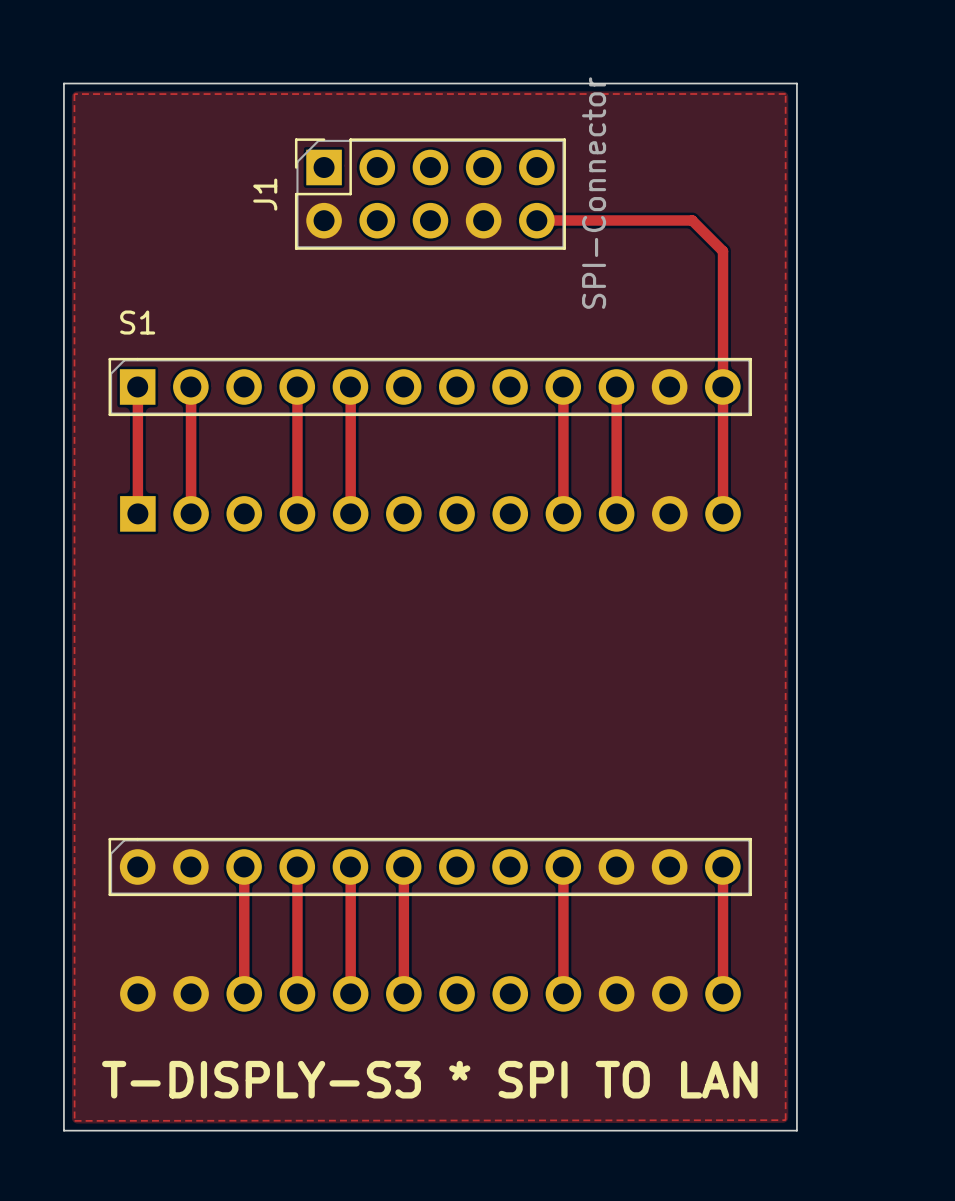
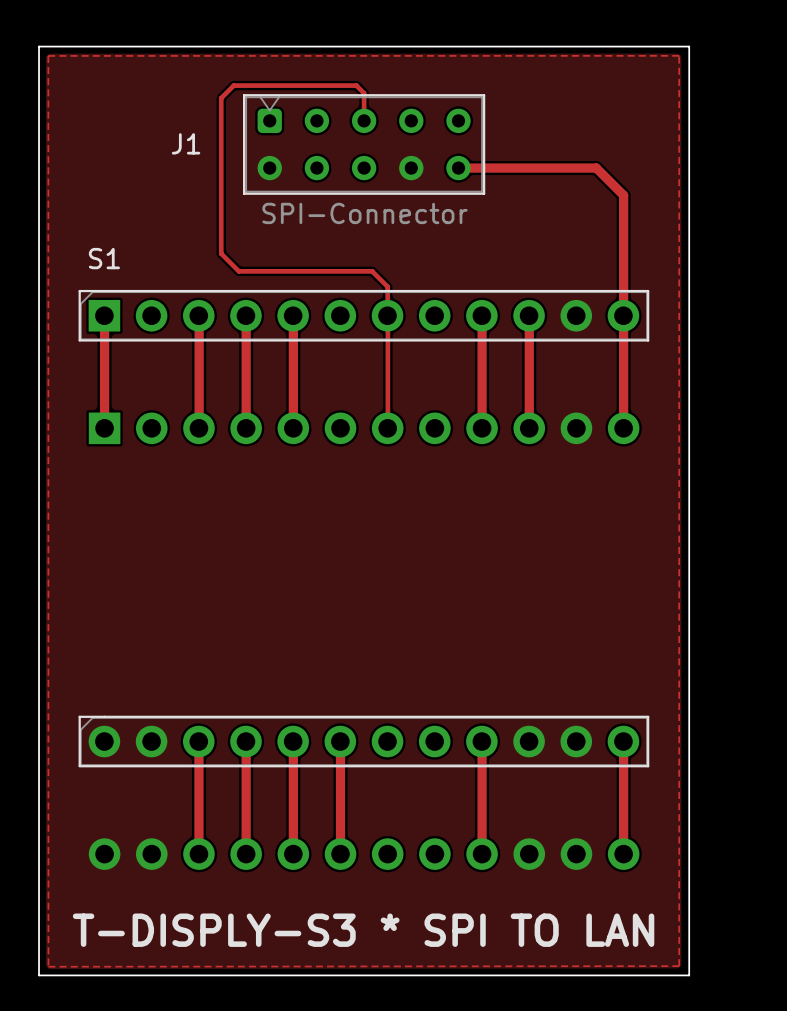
J1 footprint: [294, 138, 566, 250] -> [242, 94, 486, 195]
track: none -> (364, 120) (364, 93) (356, 85) (233, 85) (221, 98) (221, 253) (238, 271) (372, 271) (387, 286) (387, 315)
J1 value position: SPI-Connector (594, 193) -> SPI-Connector (365, 213)
track: (191, 387) (191, 513) -> (199, 315) (199, 428)
track: none -> (387, 315) (387, 428)

